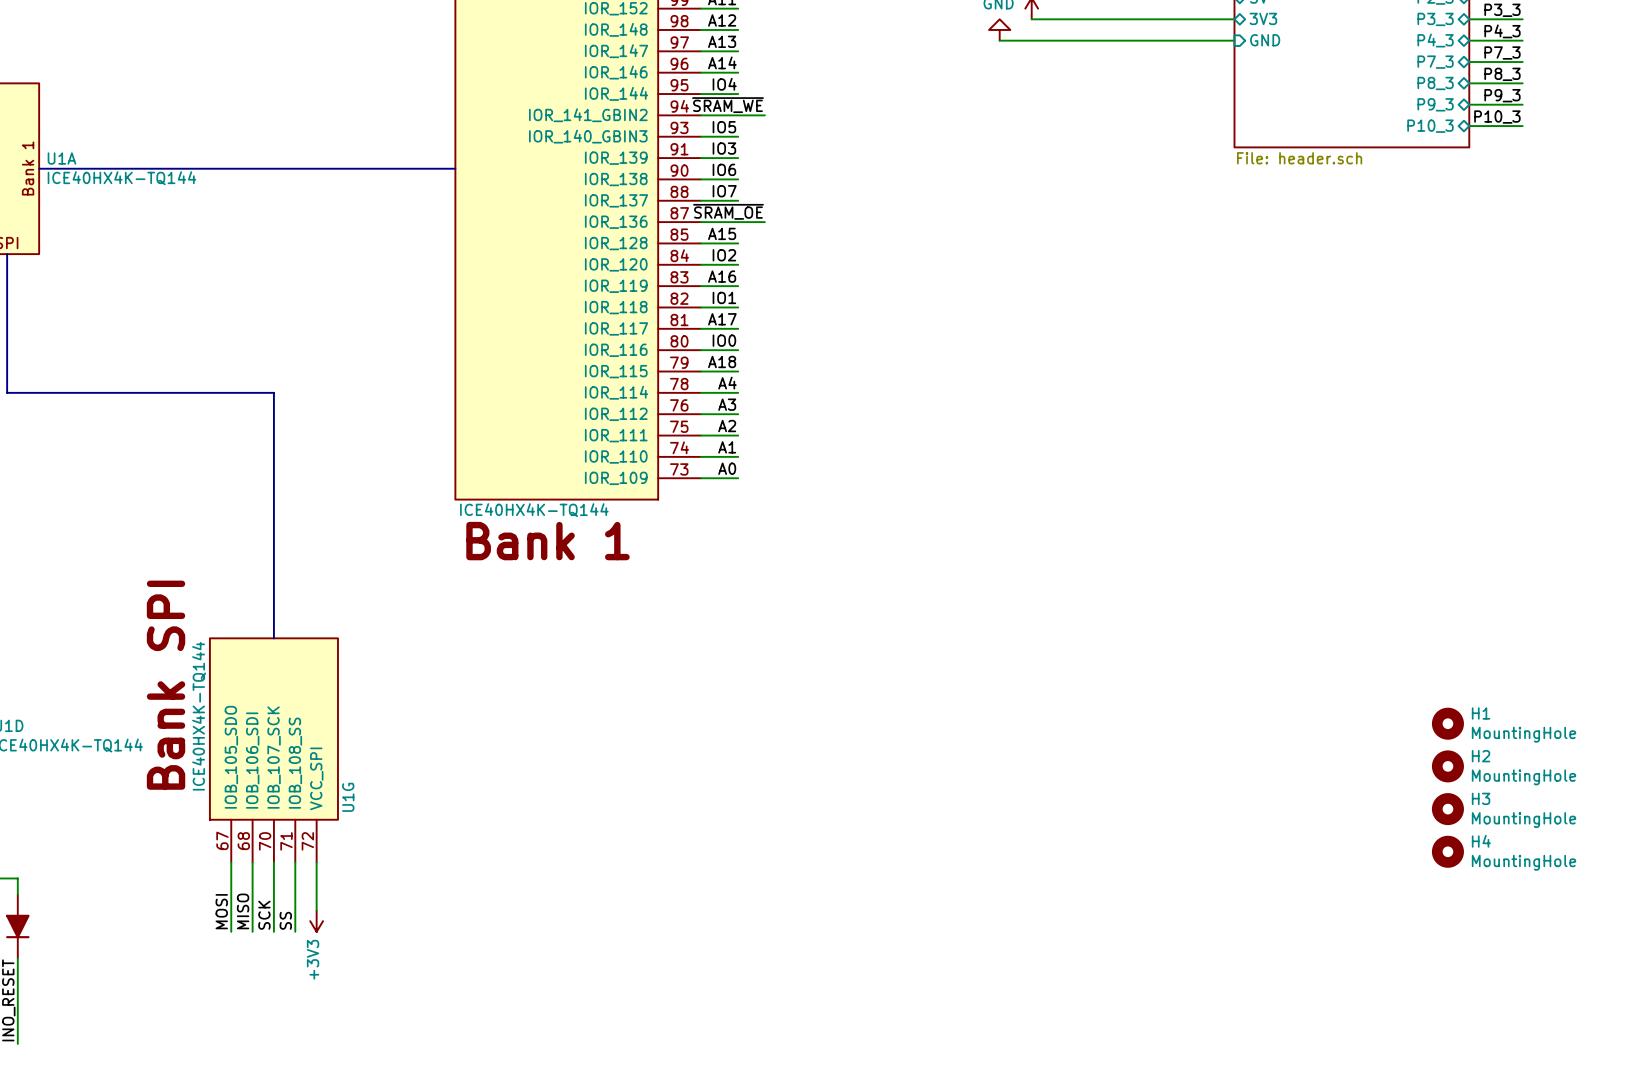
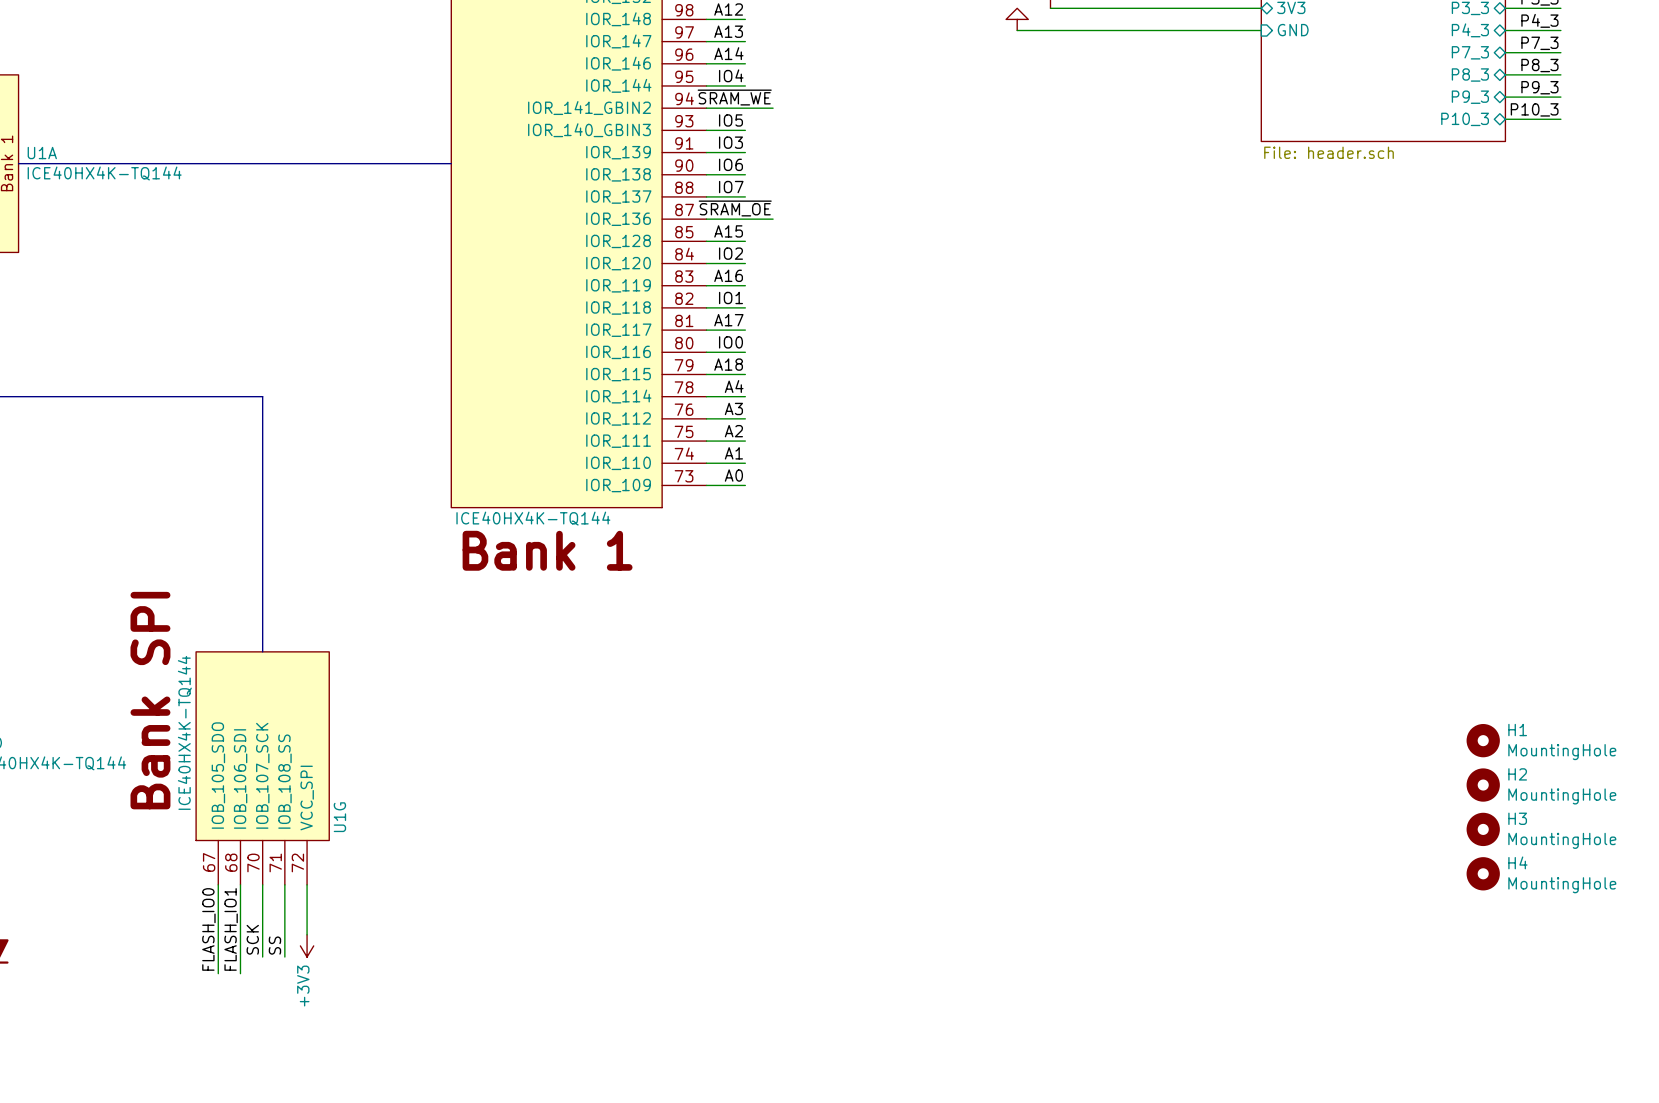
label: none -> FLASH_IO0 (208, 929)
label: none -> FLASH_IO1 (231, 929)
label: MOSI (221, 911) -> none
label: MISO (243, 911) -> none
wire: none -> (218, 957) (218, 973)
wire: none -> (240, 957) (240, 973)

